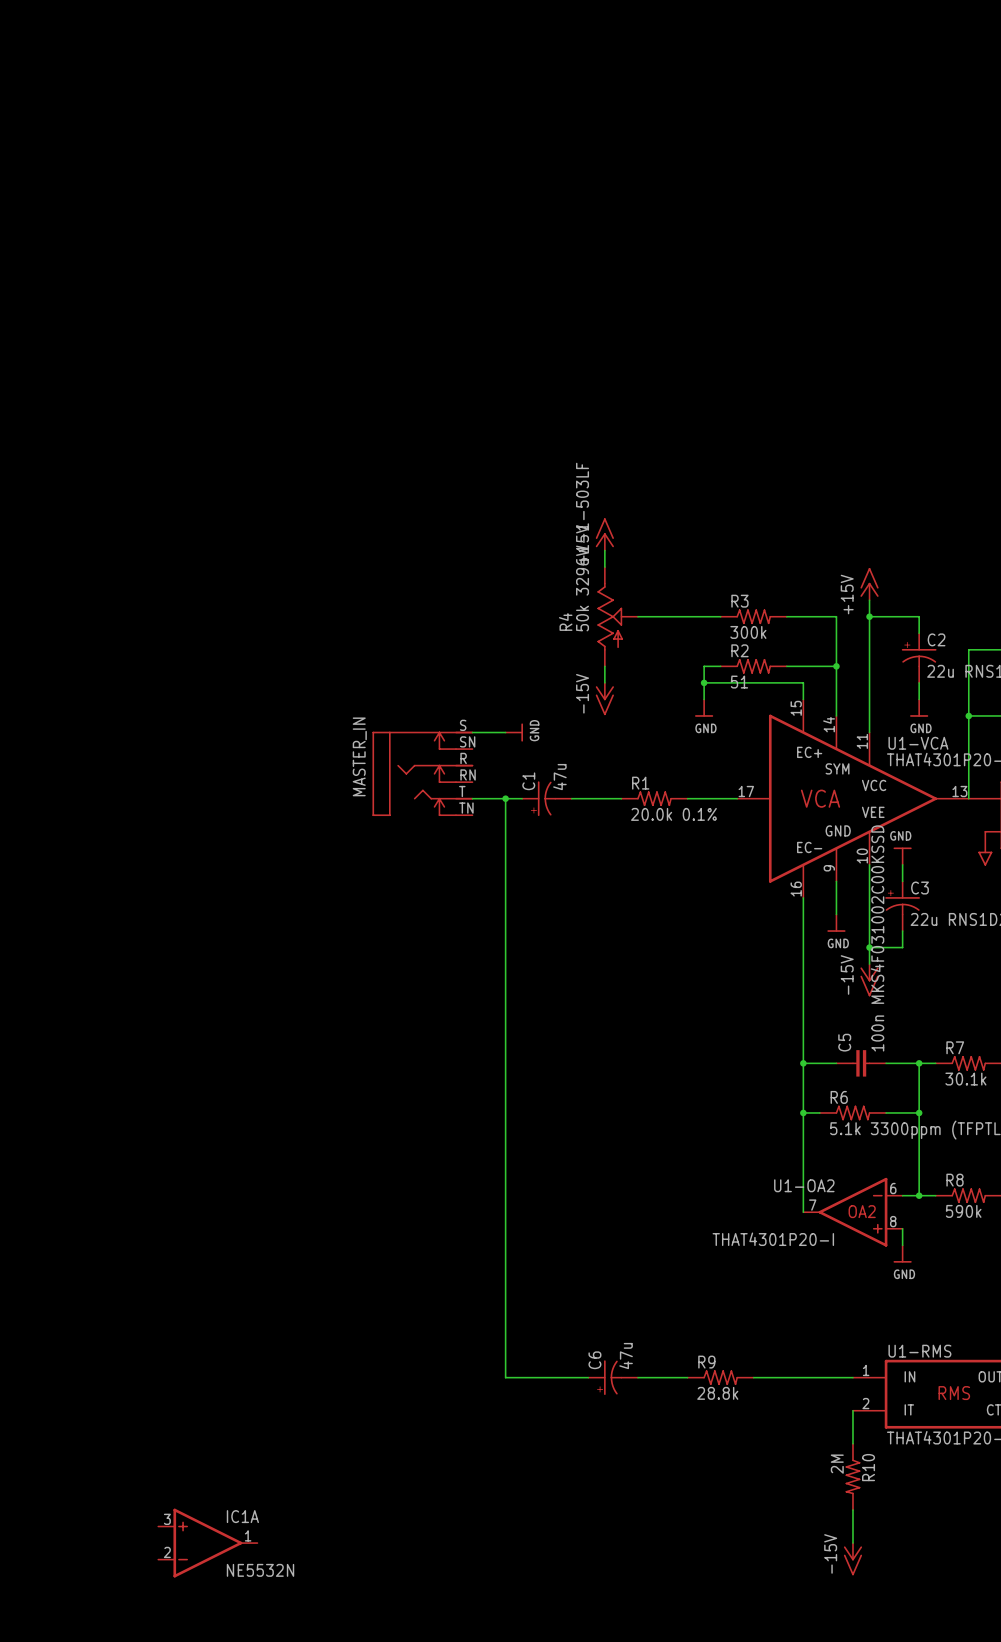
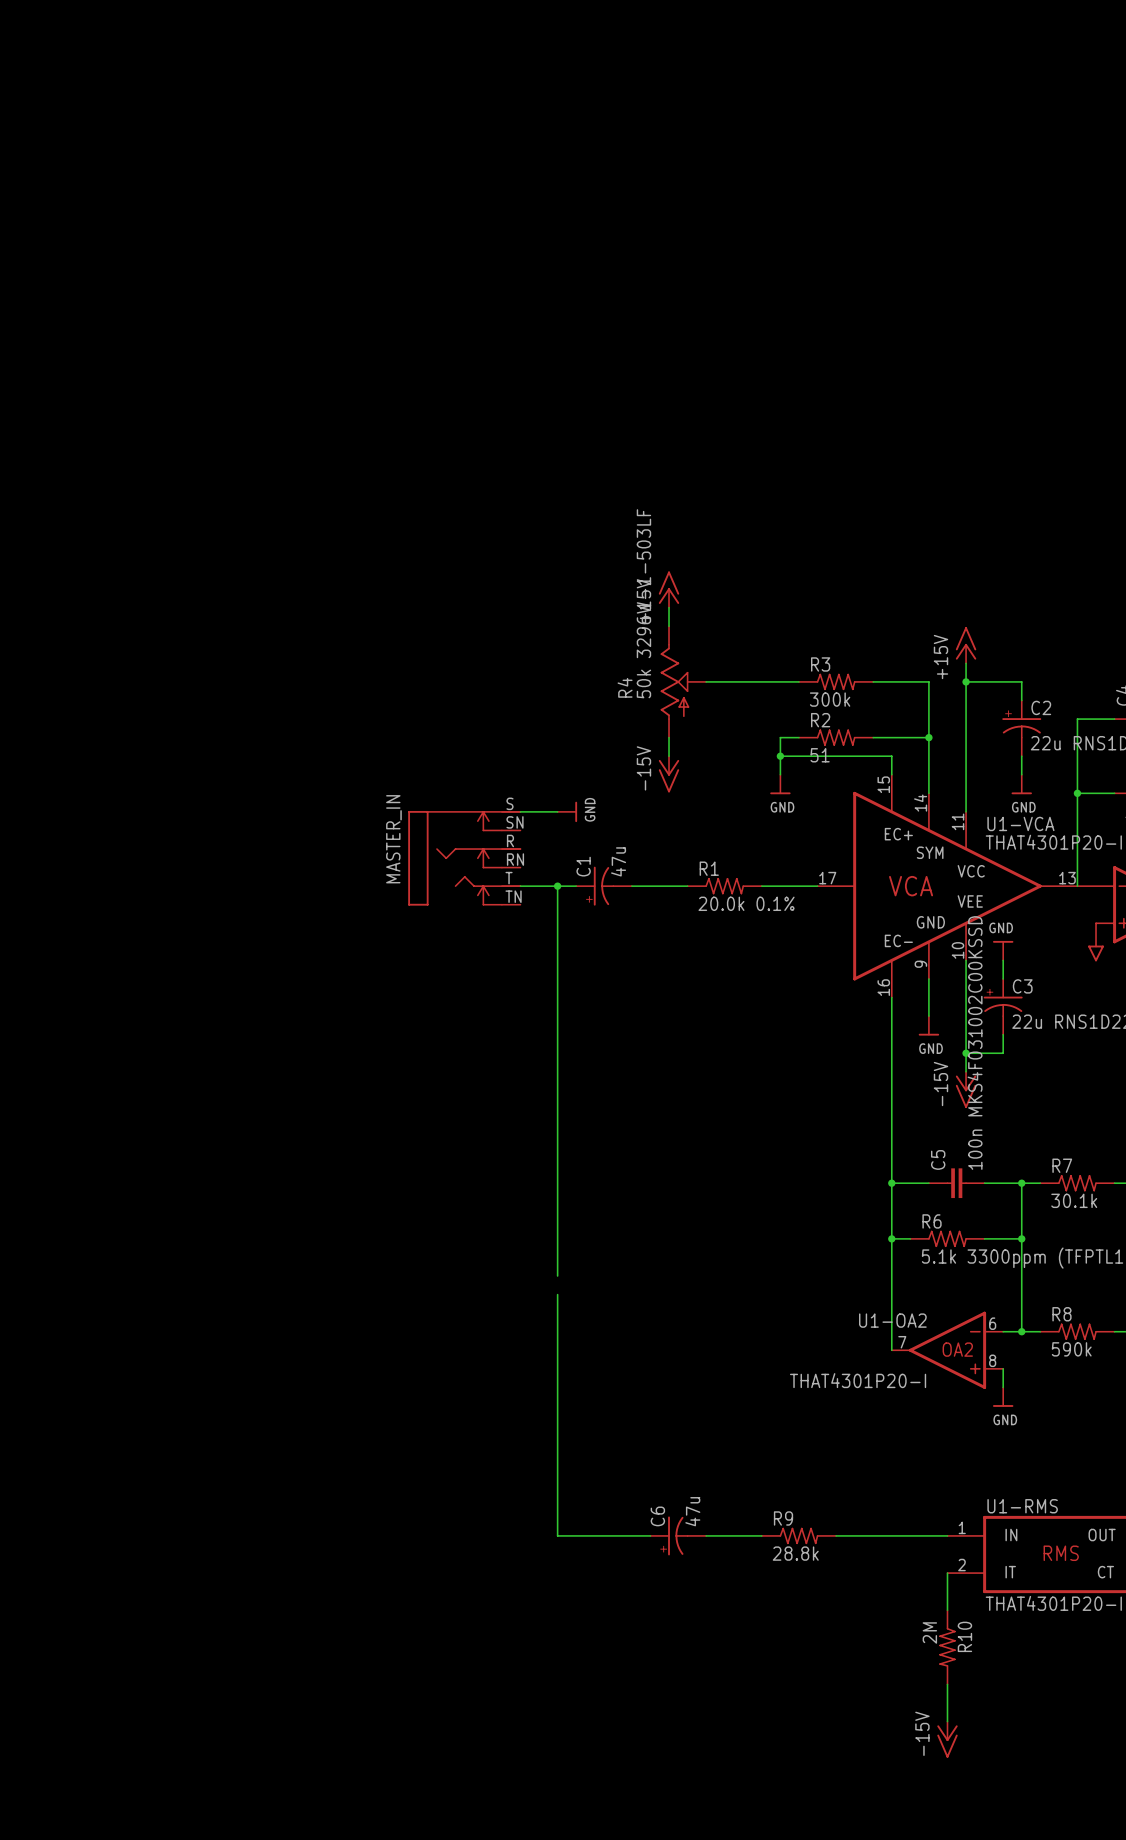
wire: (505, 1146) (505, 1162) -> none
IC1A: NE5532N (207, 1543) -> none

